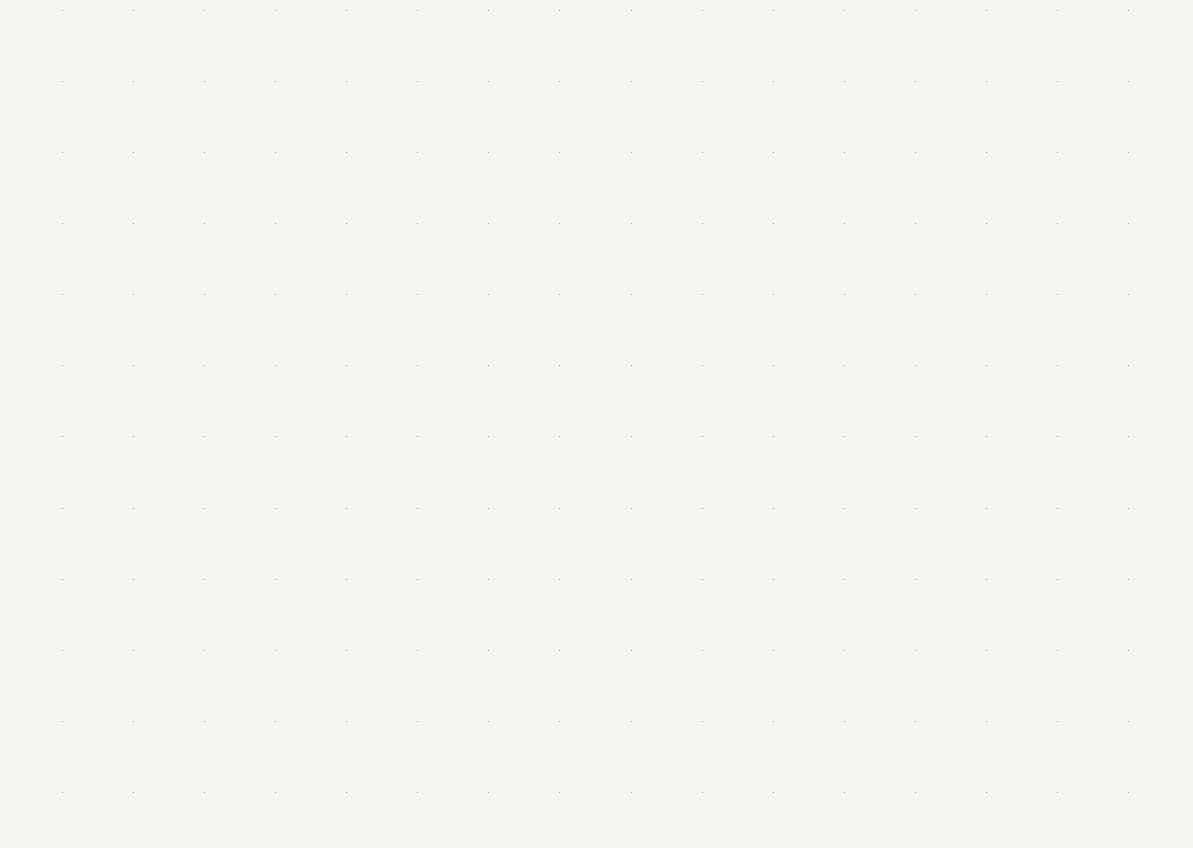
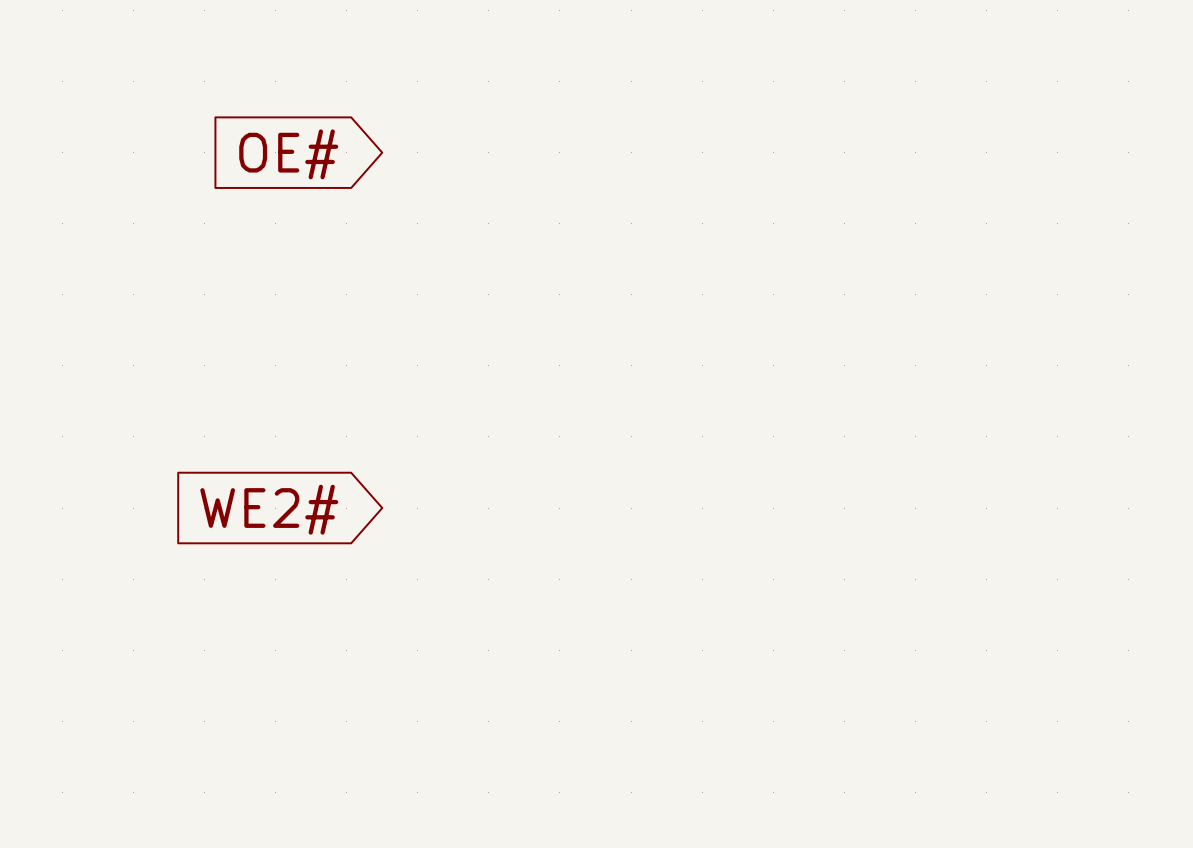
global label: none -> OE# (288, 154)
global label: none -> WE2# (269, 509)

